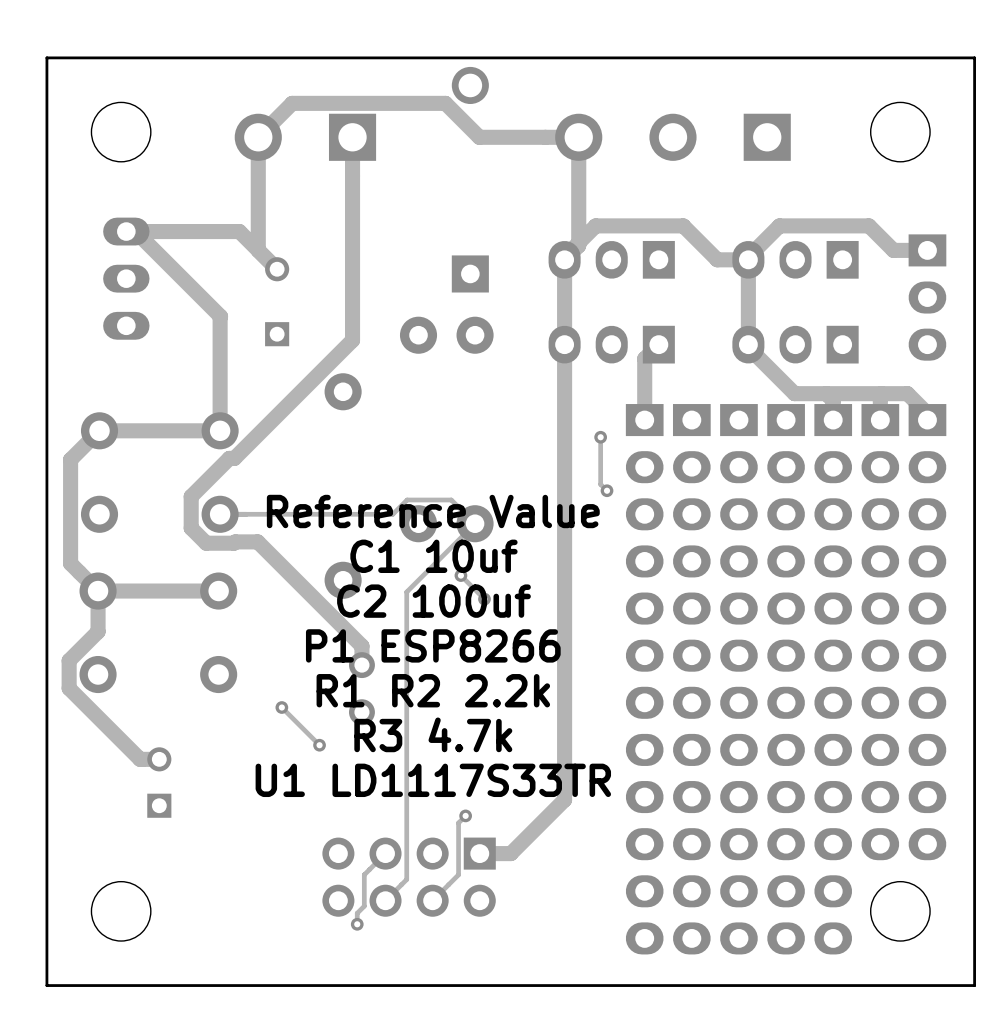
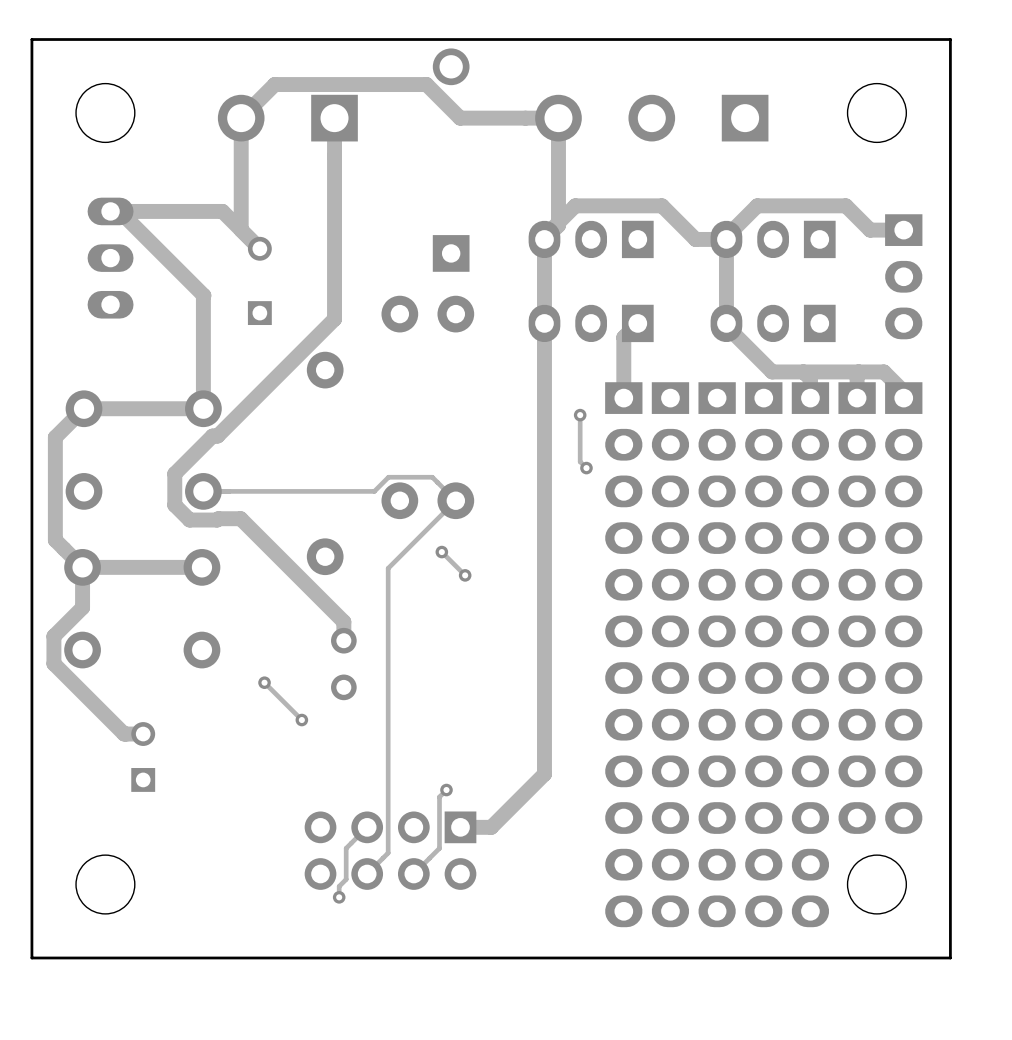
text: Reference Value (433, 511) -> none
text: C1 10uf (433, 556) -> none
text: C2 100uf (433, 601) -> none
text: P1 ESP8266 (433, 645) -> none
text: R1 R2 2.2k (433, 690) -> none
text: R3 4.7k (433, 734) -> none
text: U1 LD1117S33TR (433, 780) -> none

